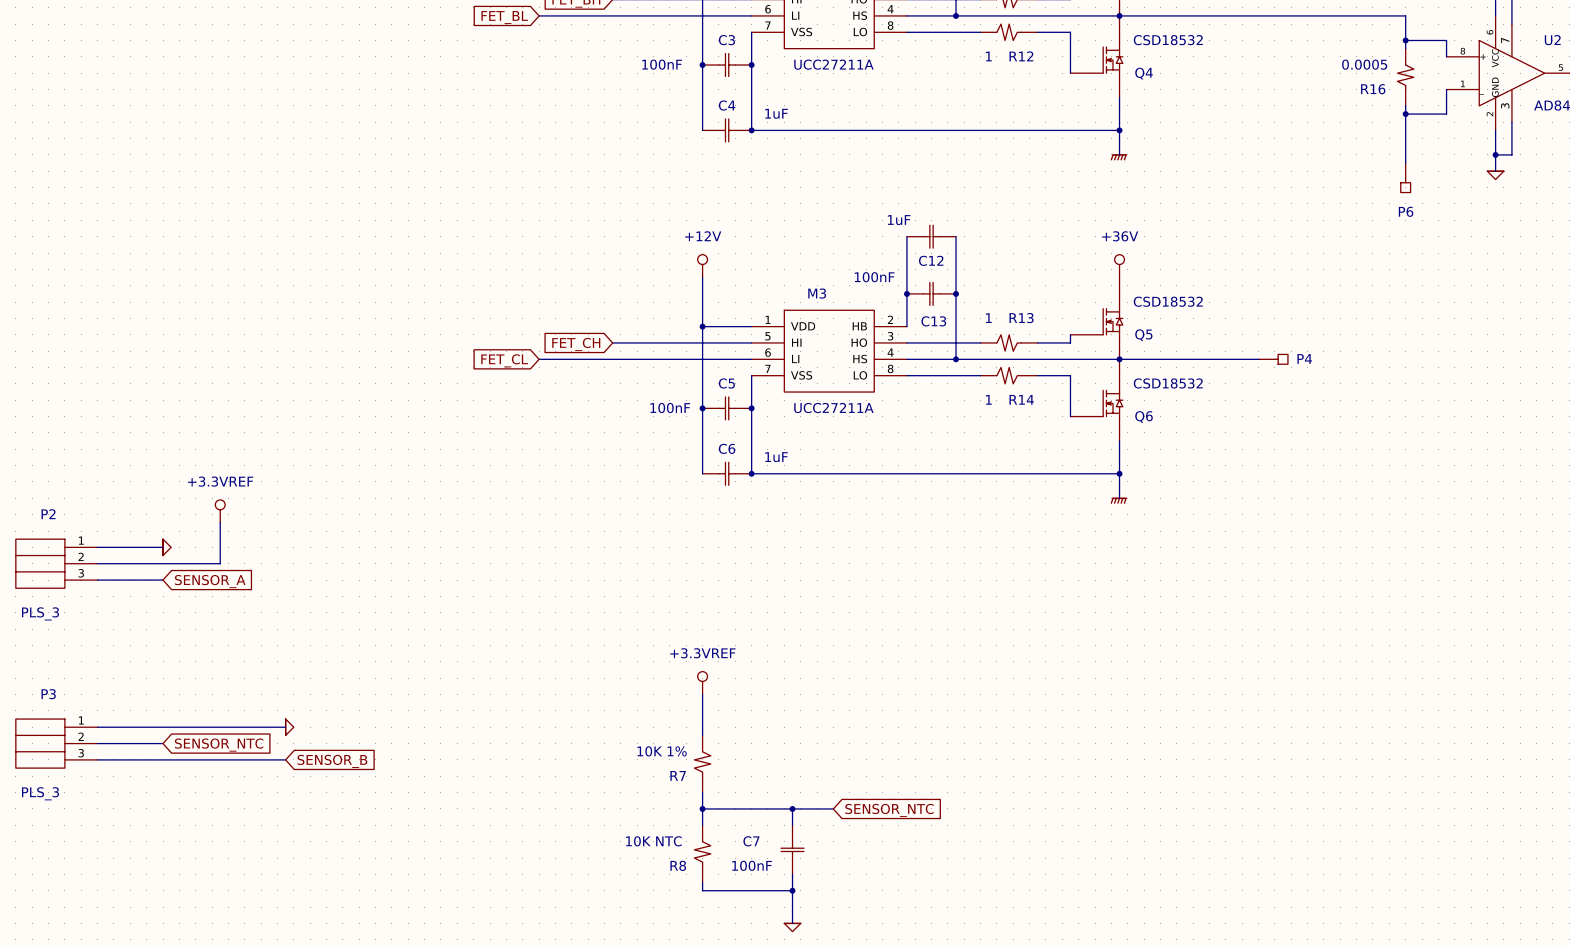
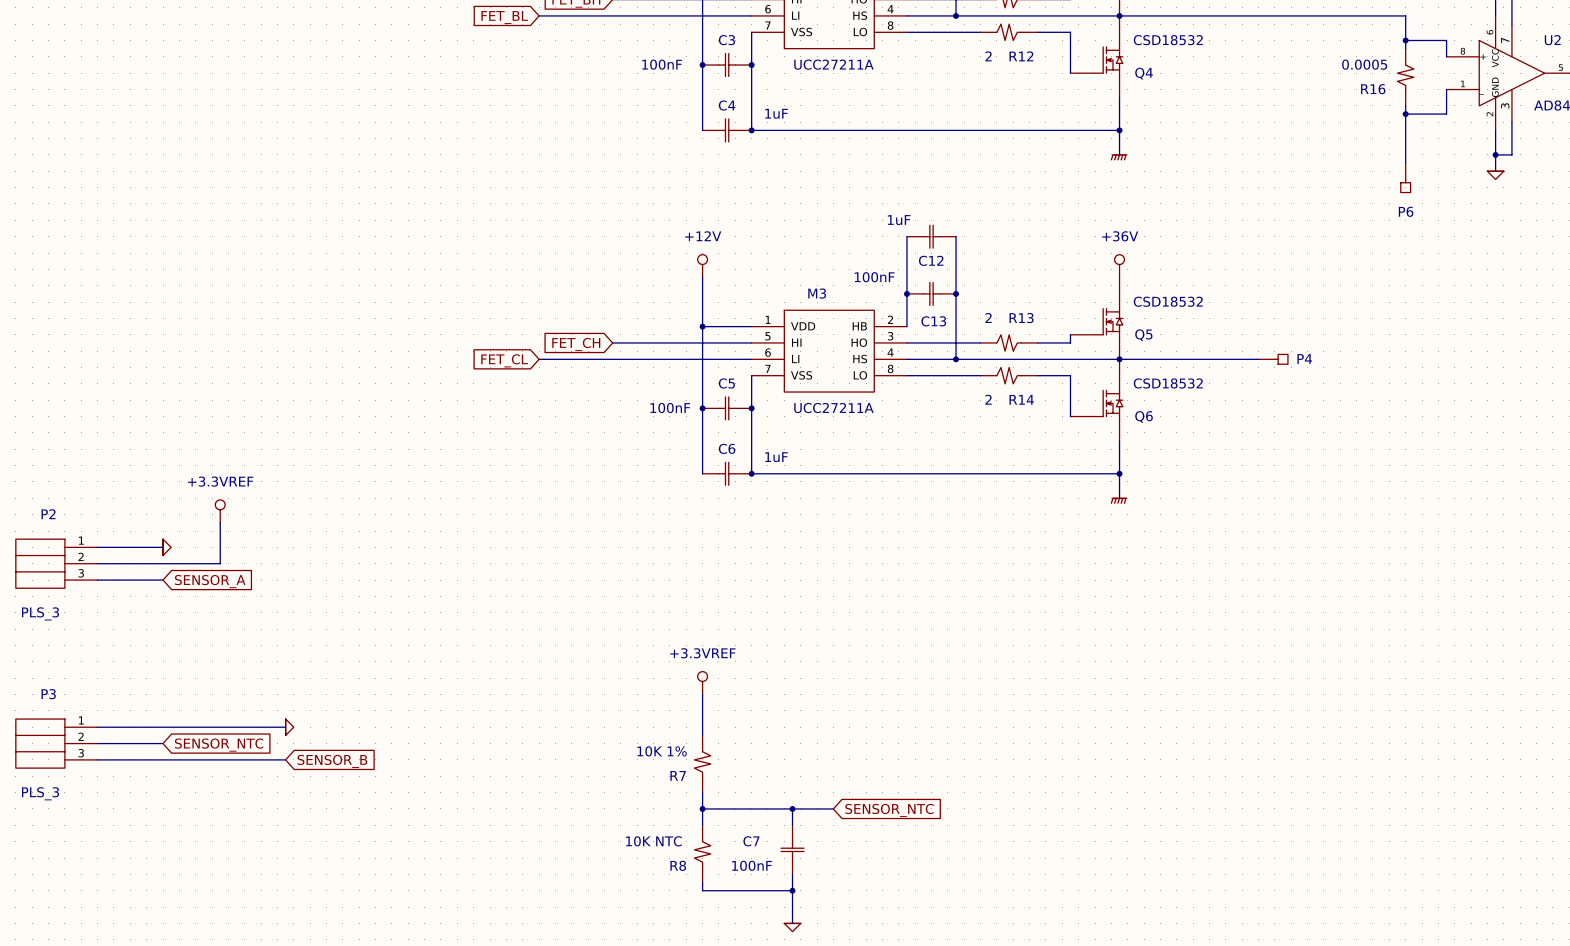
R12 value: 1 (988, 56) -> 2 (988, 56)
R13 value: 1 (988, 318) -> 2 (988, 317)
R14 value: 1 (988, 399) -> 2 (988, 399)

